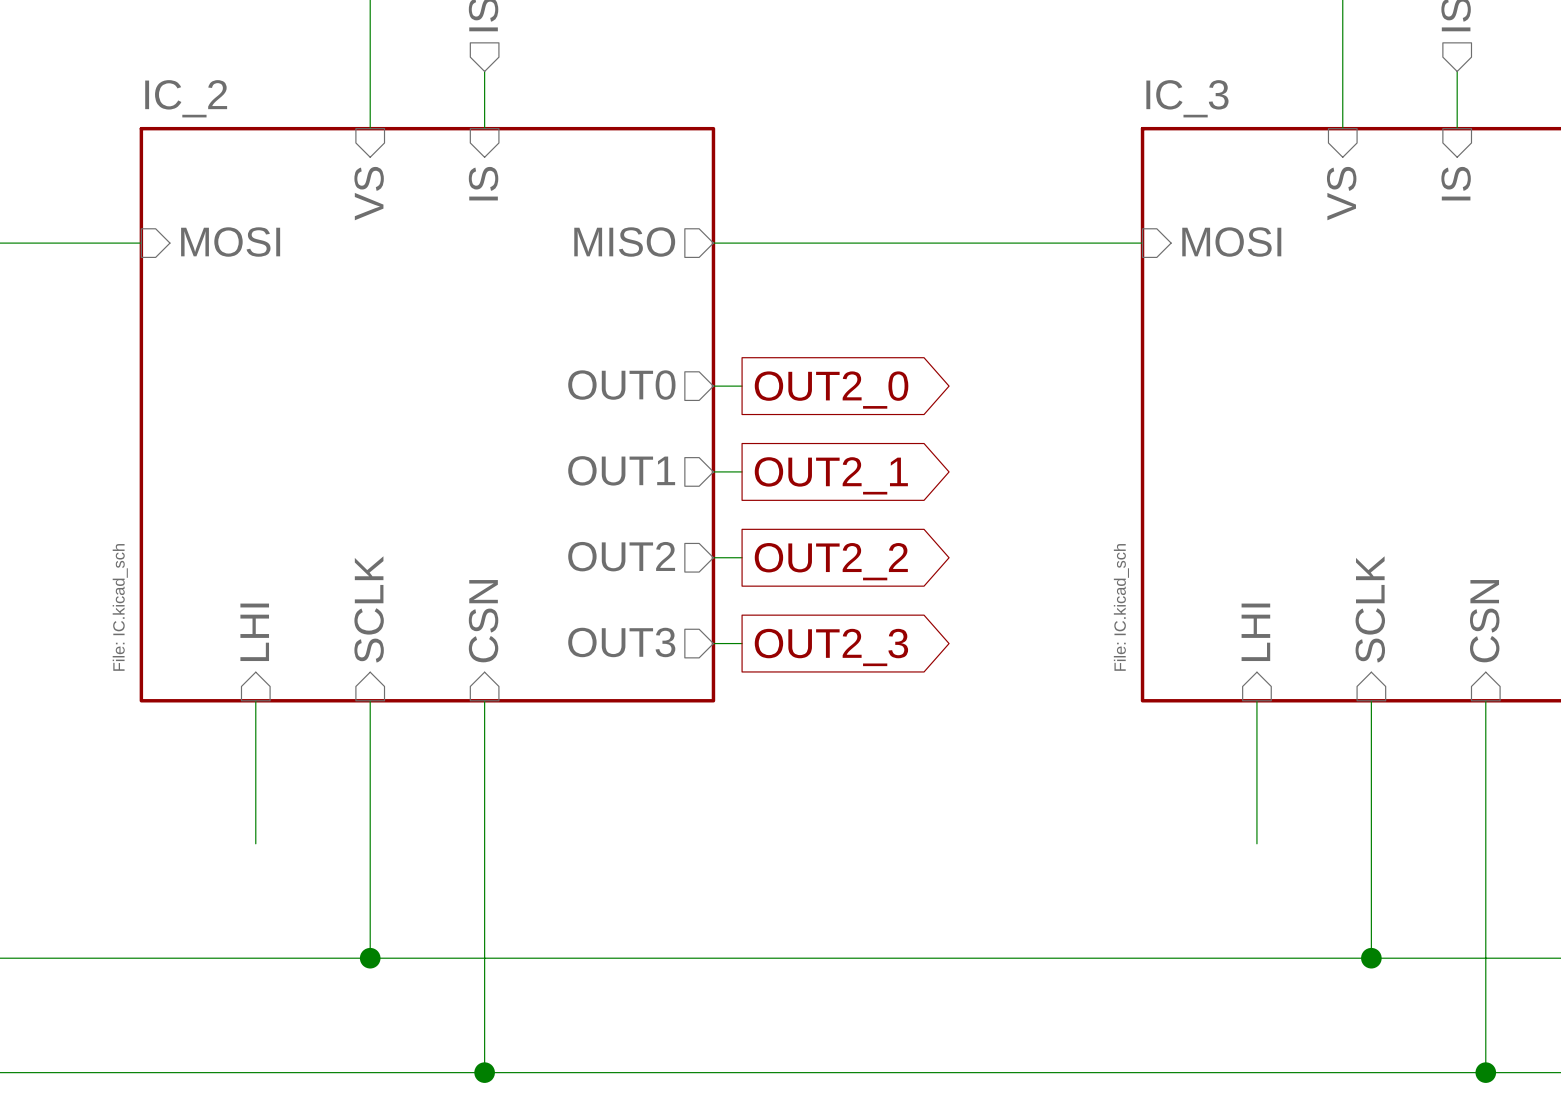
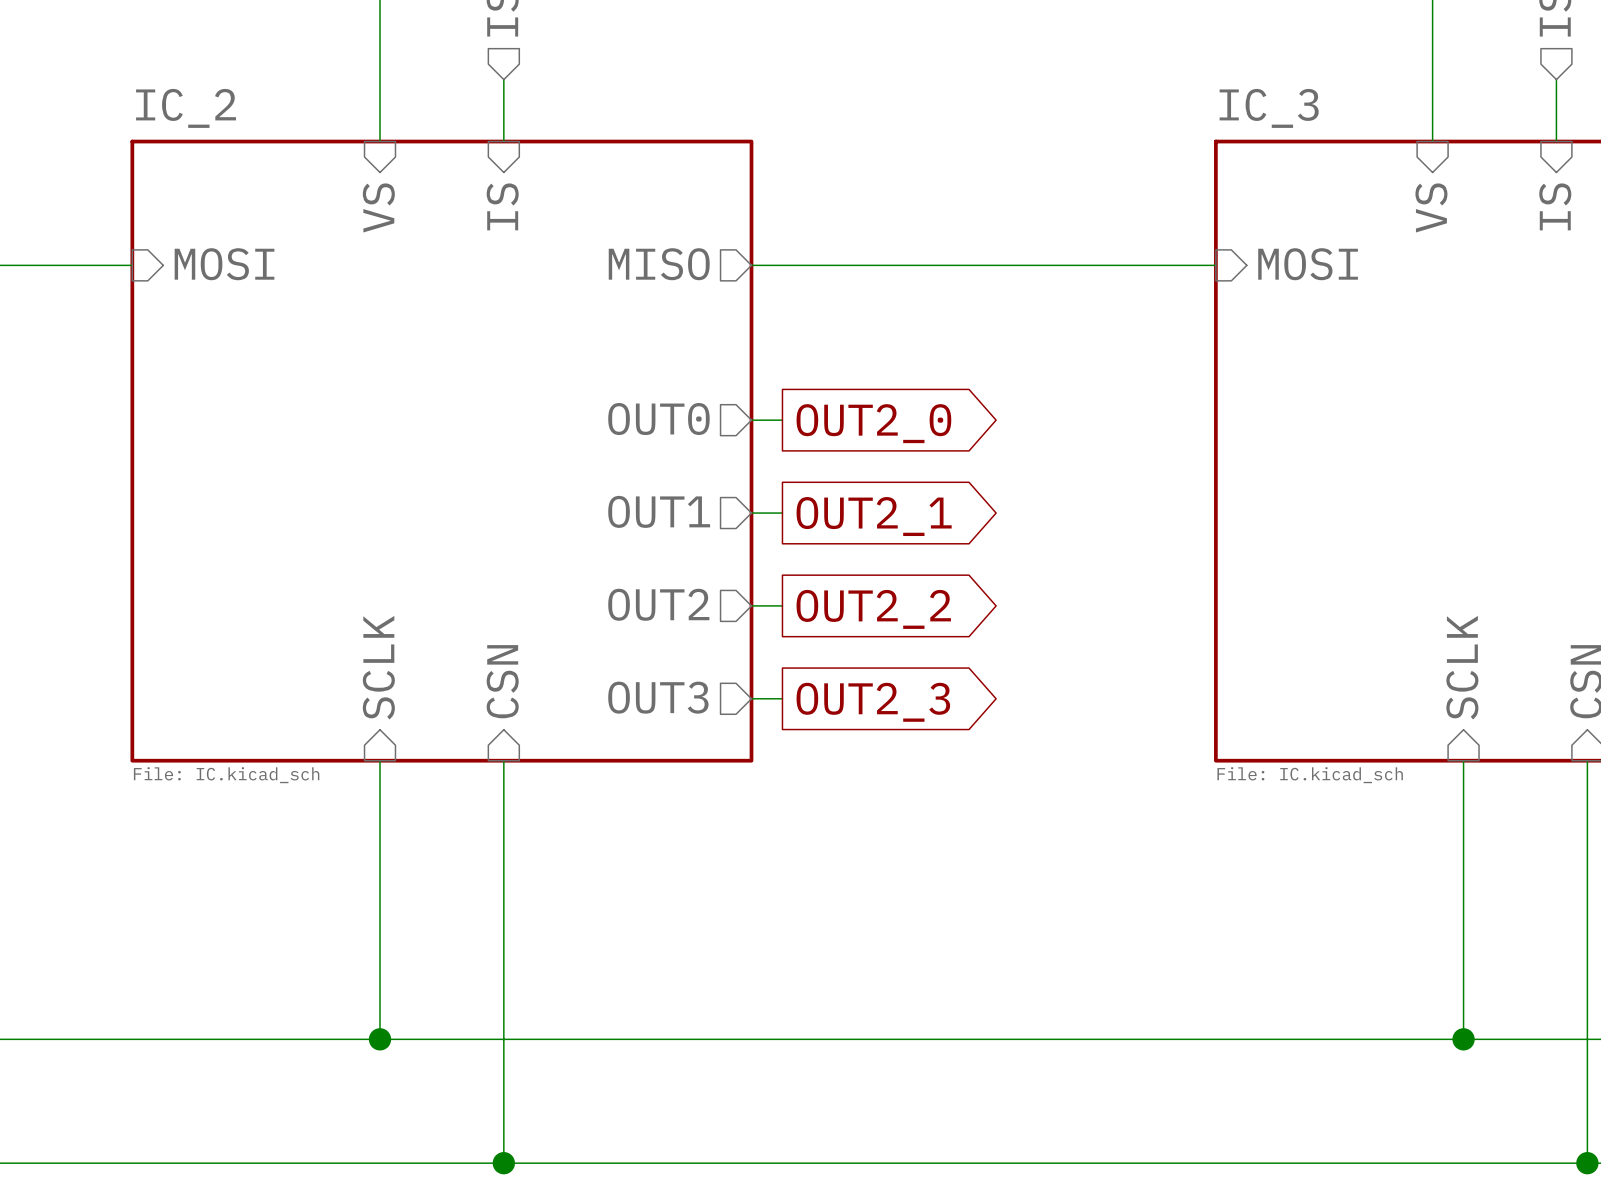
sheet IC_2 value rotation: 0° (120, 607) -> 90° clockwise (226, 775)
sheet IC_3 value rotation: 0° (1121, 607) -> 90° clockwise (1310, 775)
sheet pin: LHI (254, 632) -> none
sheet pin: LHI (1255, 632) -> none
wire: (255, 700) (255, 843) -> none
wire: (1256, 700) (1256, 843) -> none

